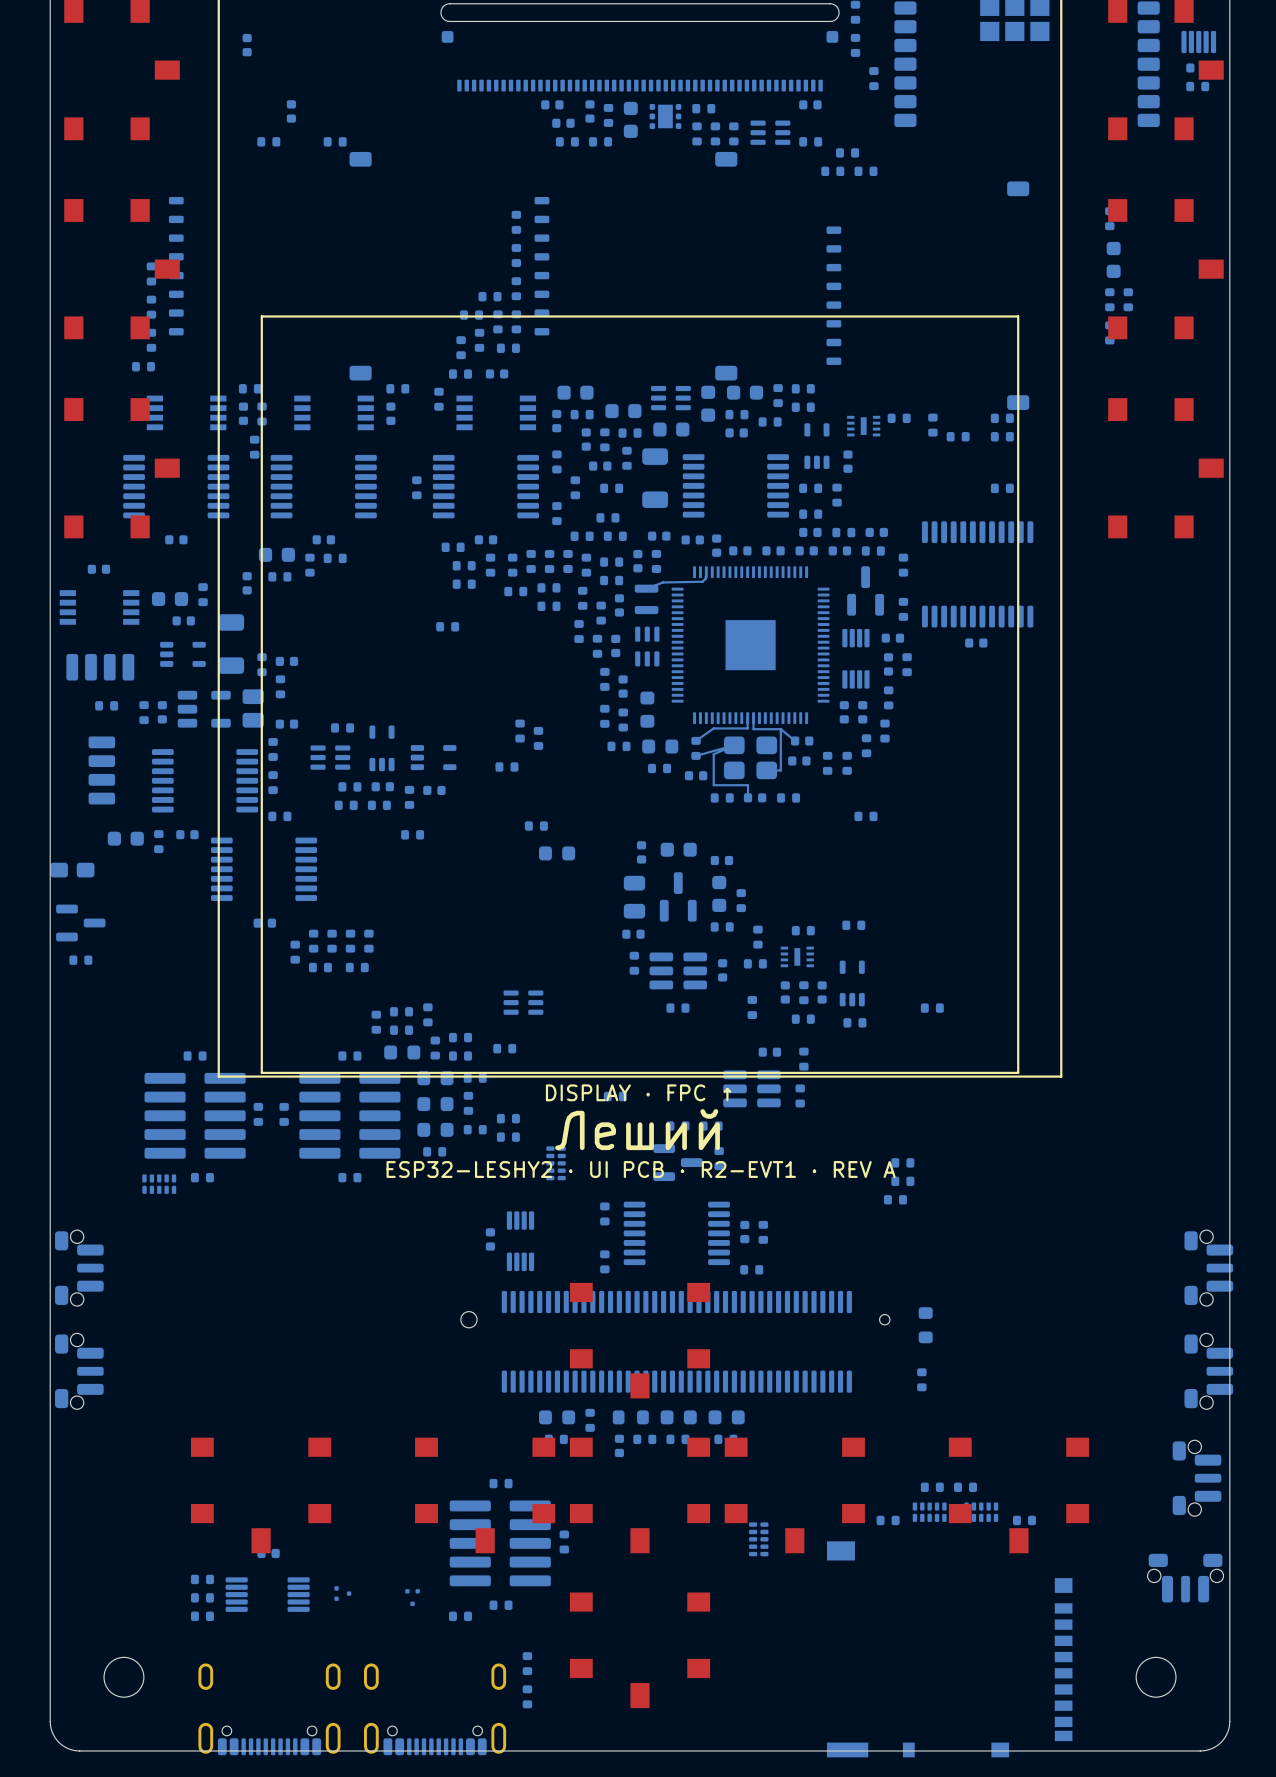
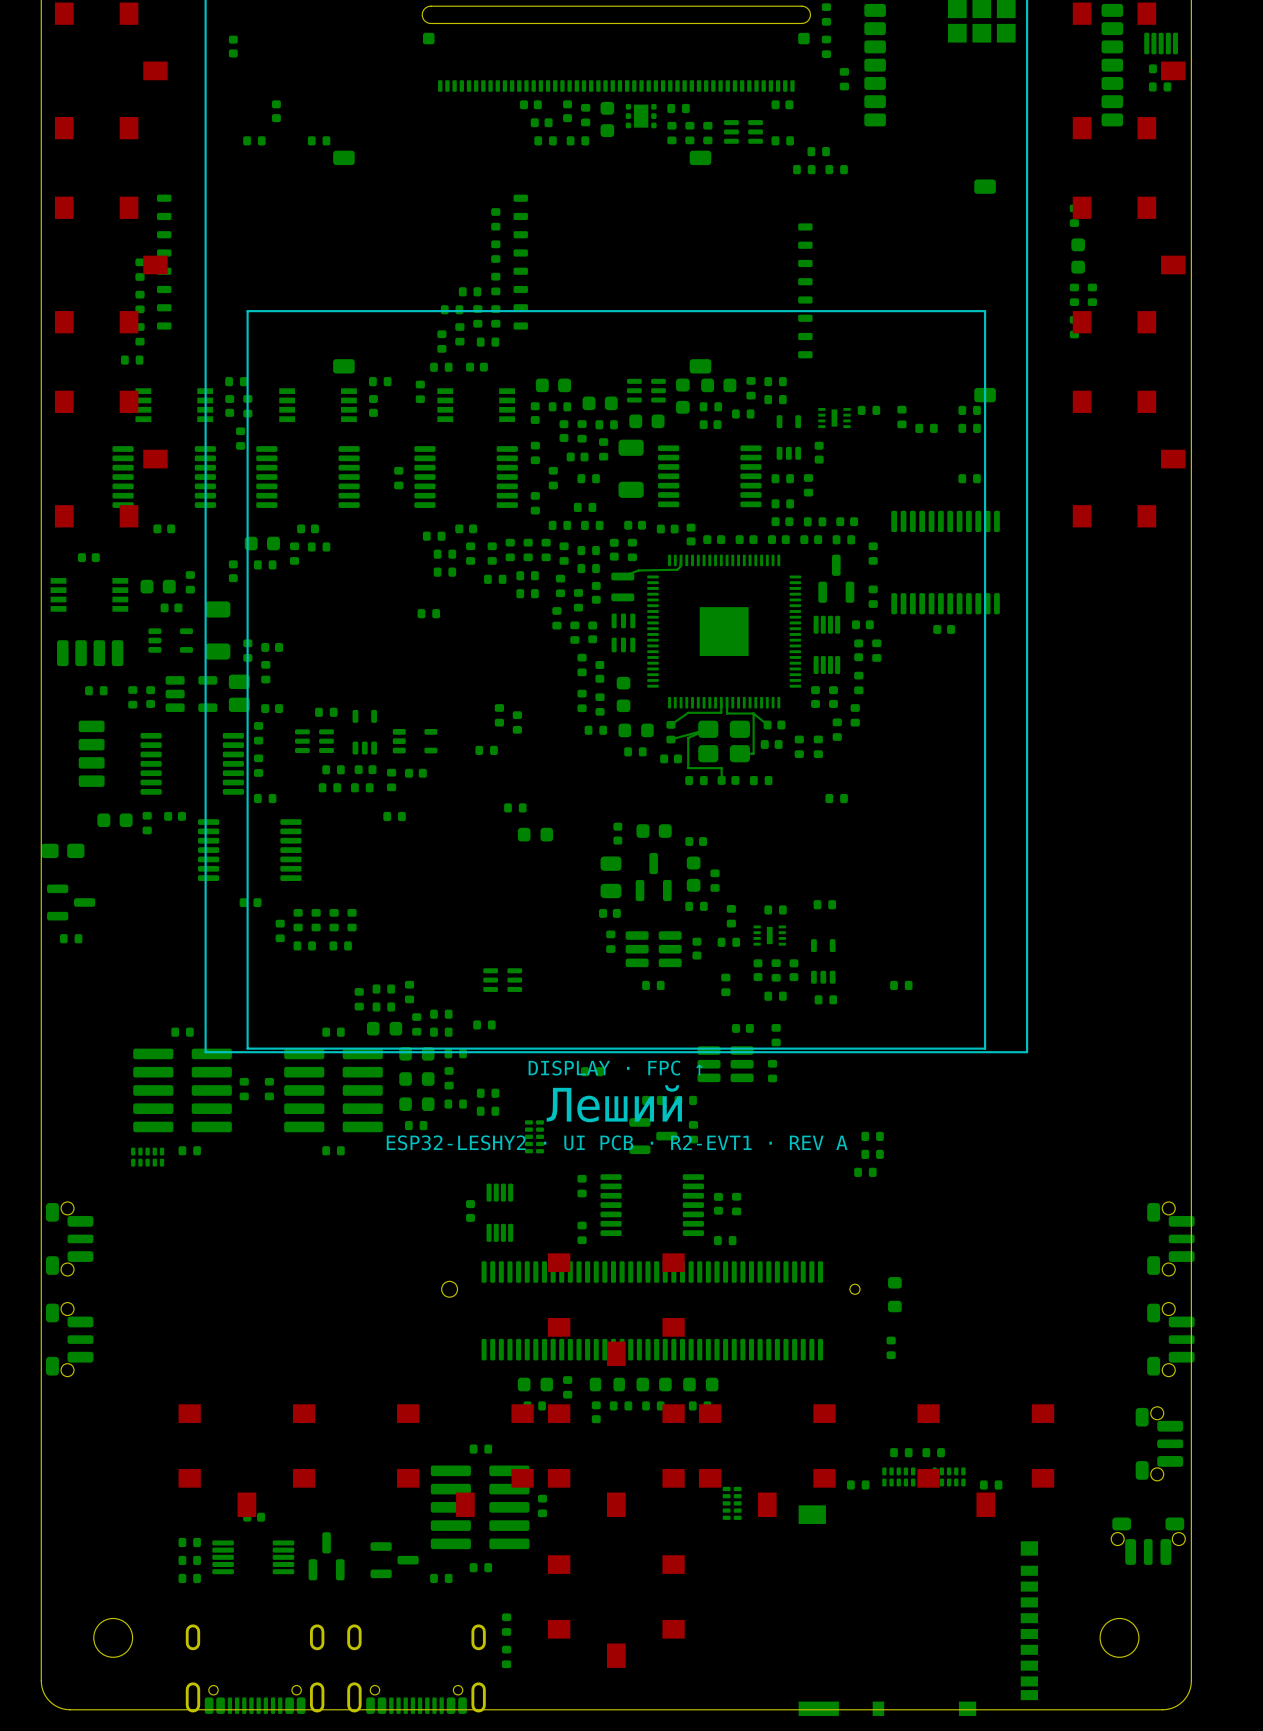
part footprint: [334, 1586, 352, 1601] -> [308, 1532, 345, 1581]
part footprint: [405, 1589, 420, 1607] -> [370, 1542, 419, 1579]

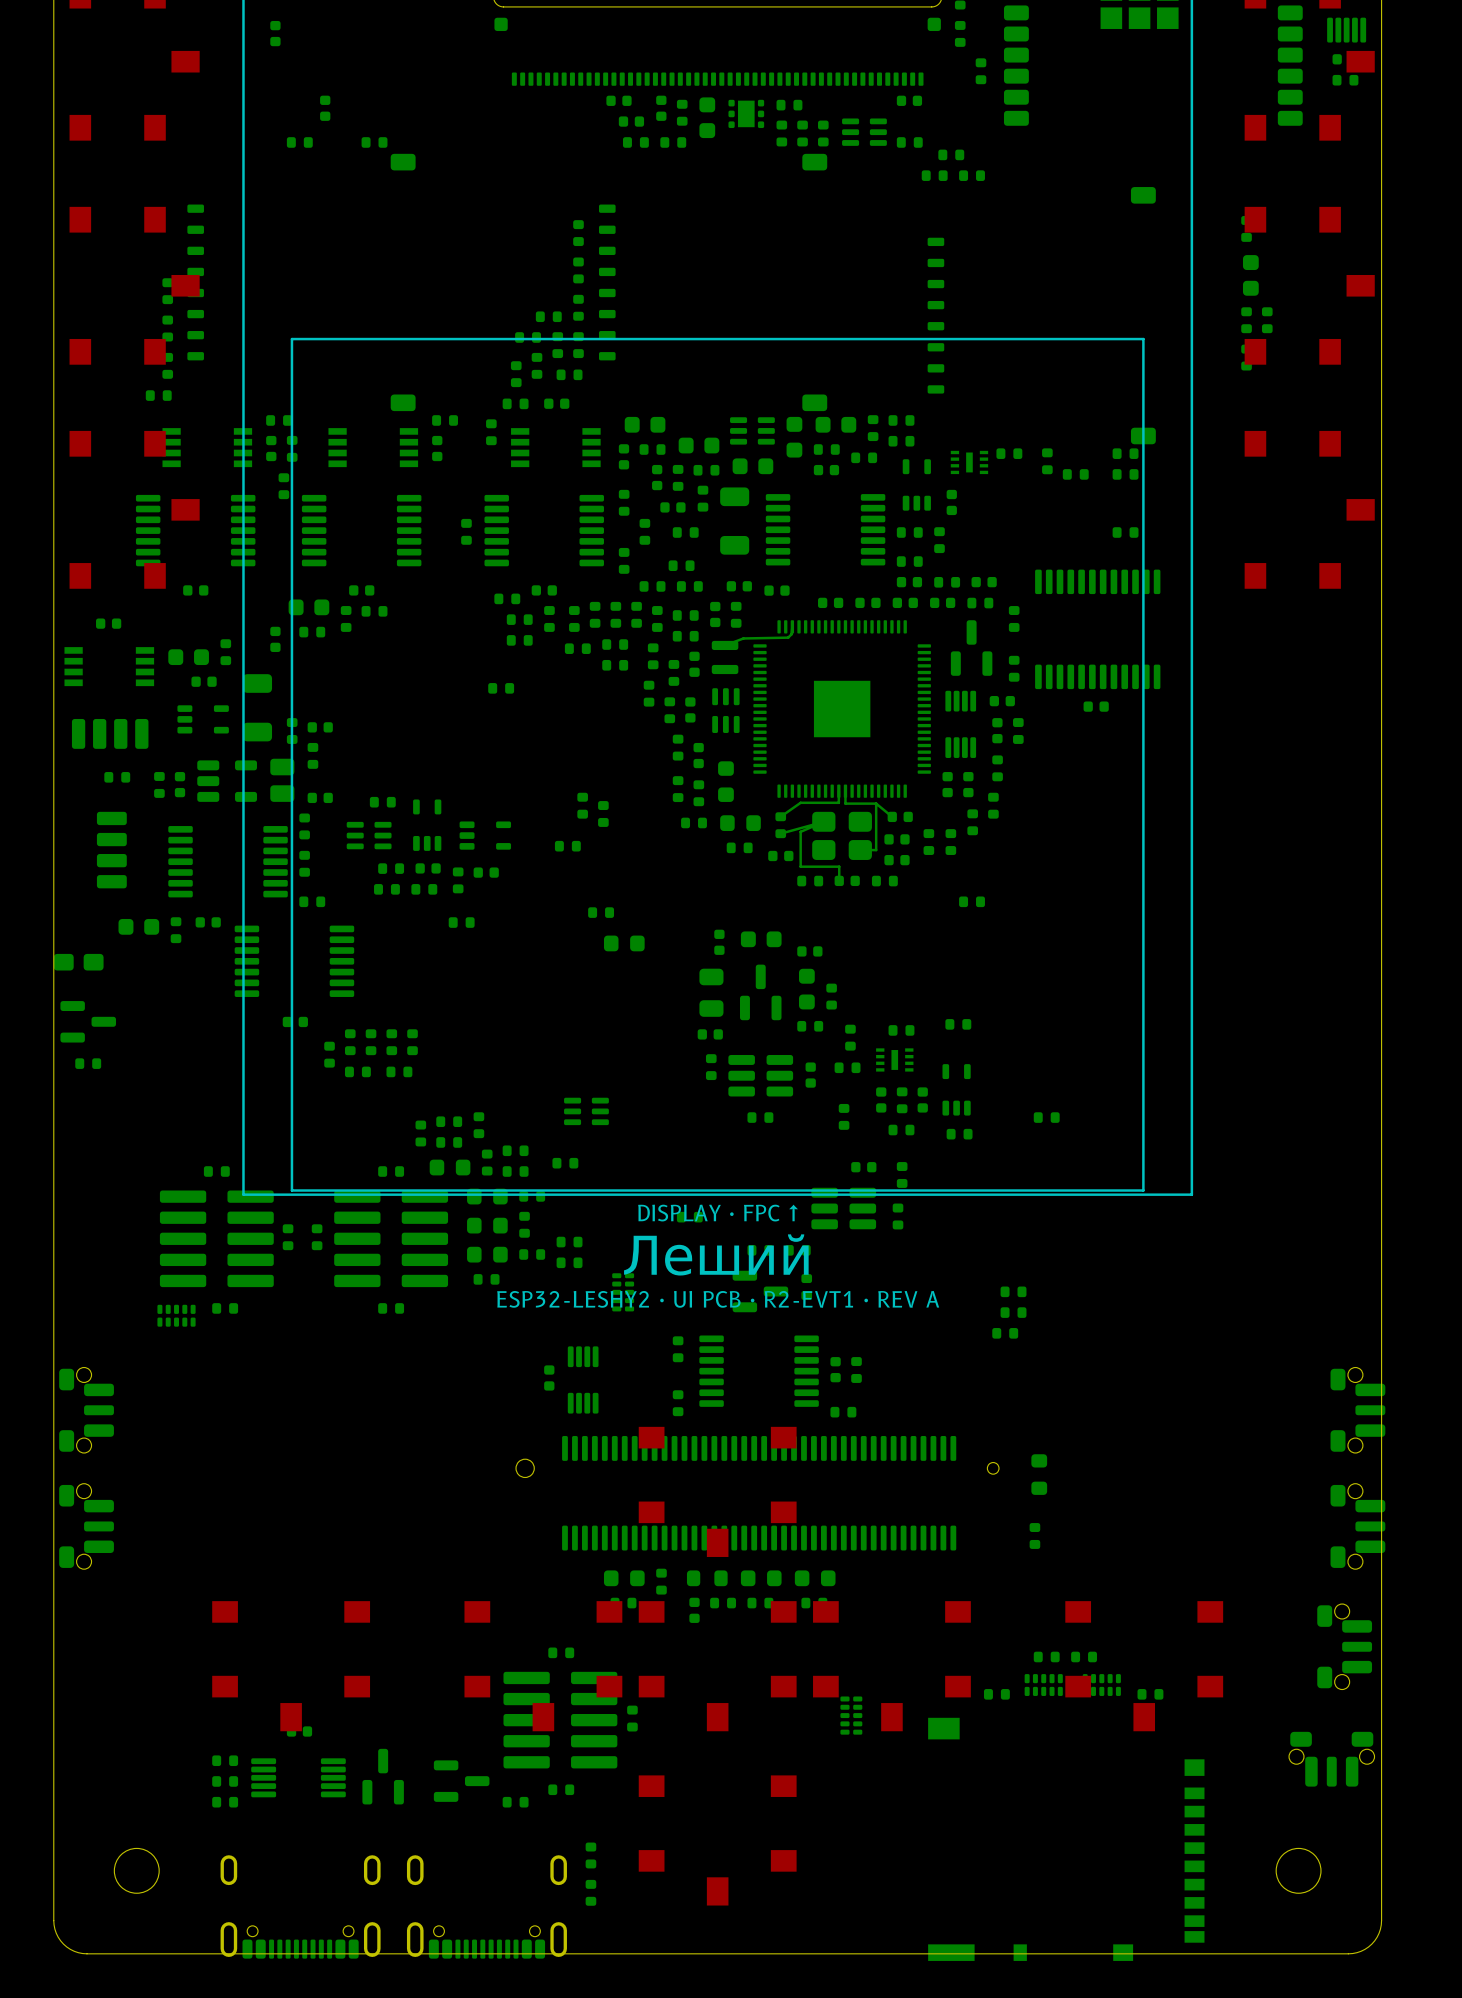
part rotation: 0° (691, 534) -> 90° clockwise (897, 860)
part position: (691, 534) -> (897, 860)

